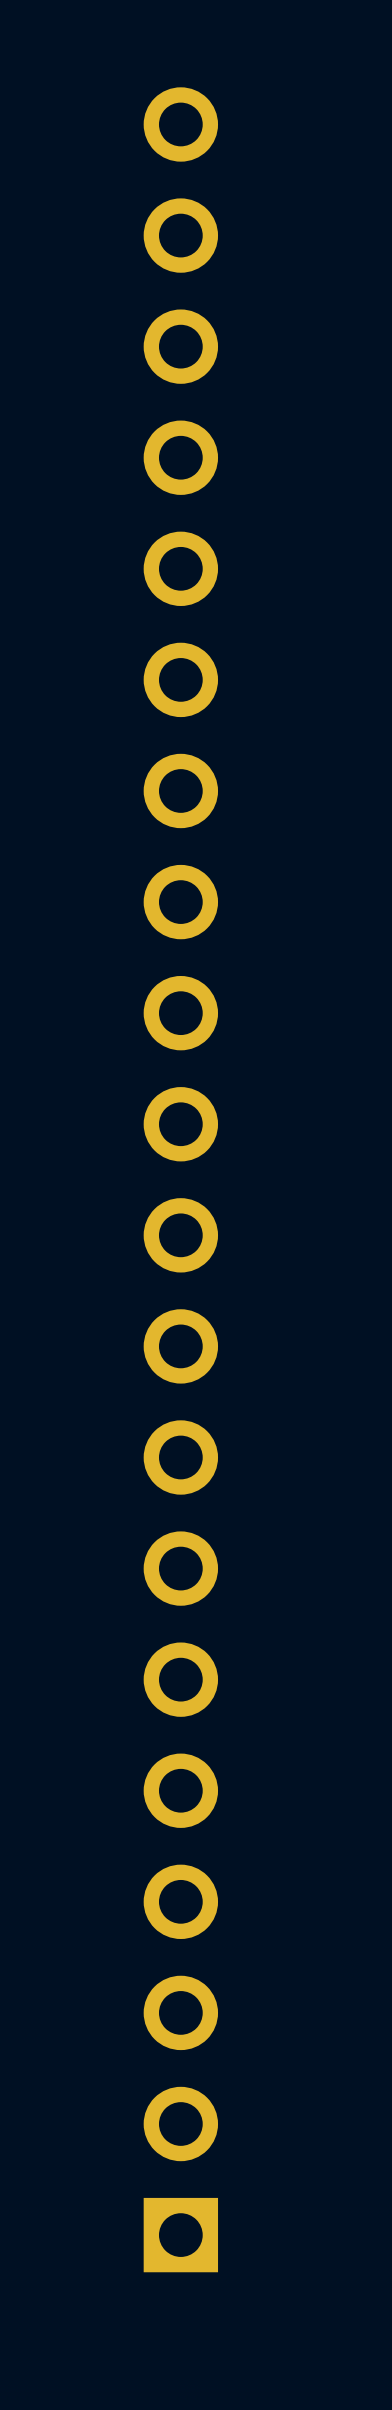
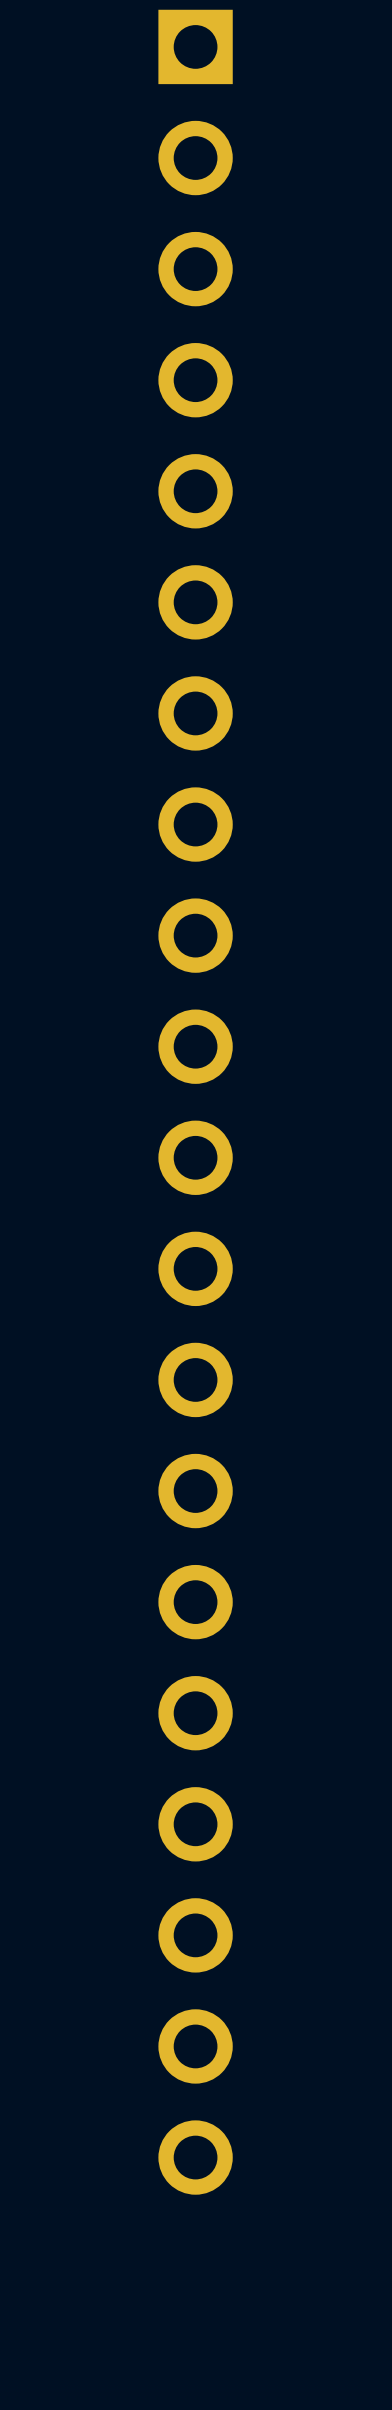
part rotation: 0° (180, 1179) -> 180° (195, 1102)

